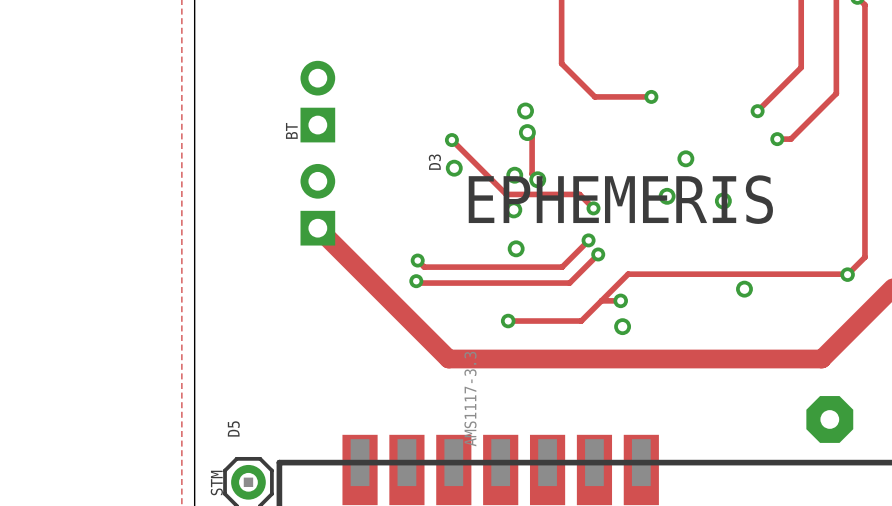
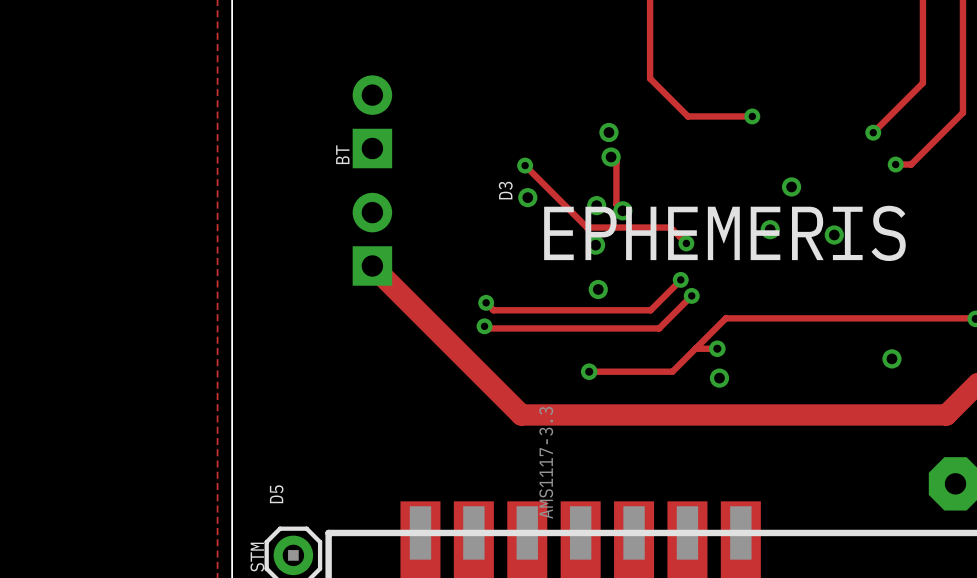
via position: (744, 289) -> (891, 358)

